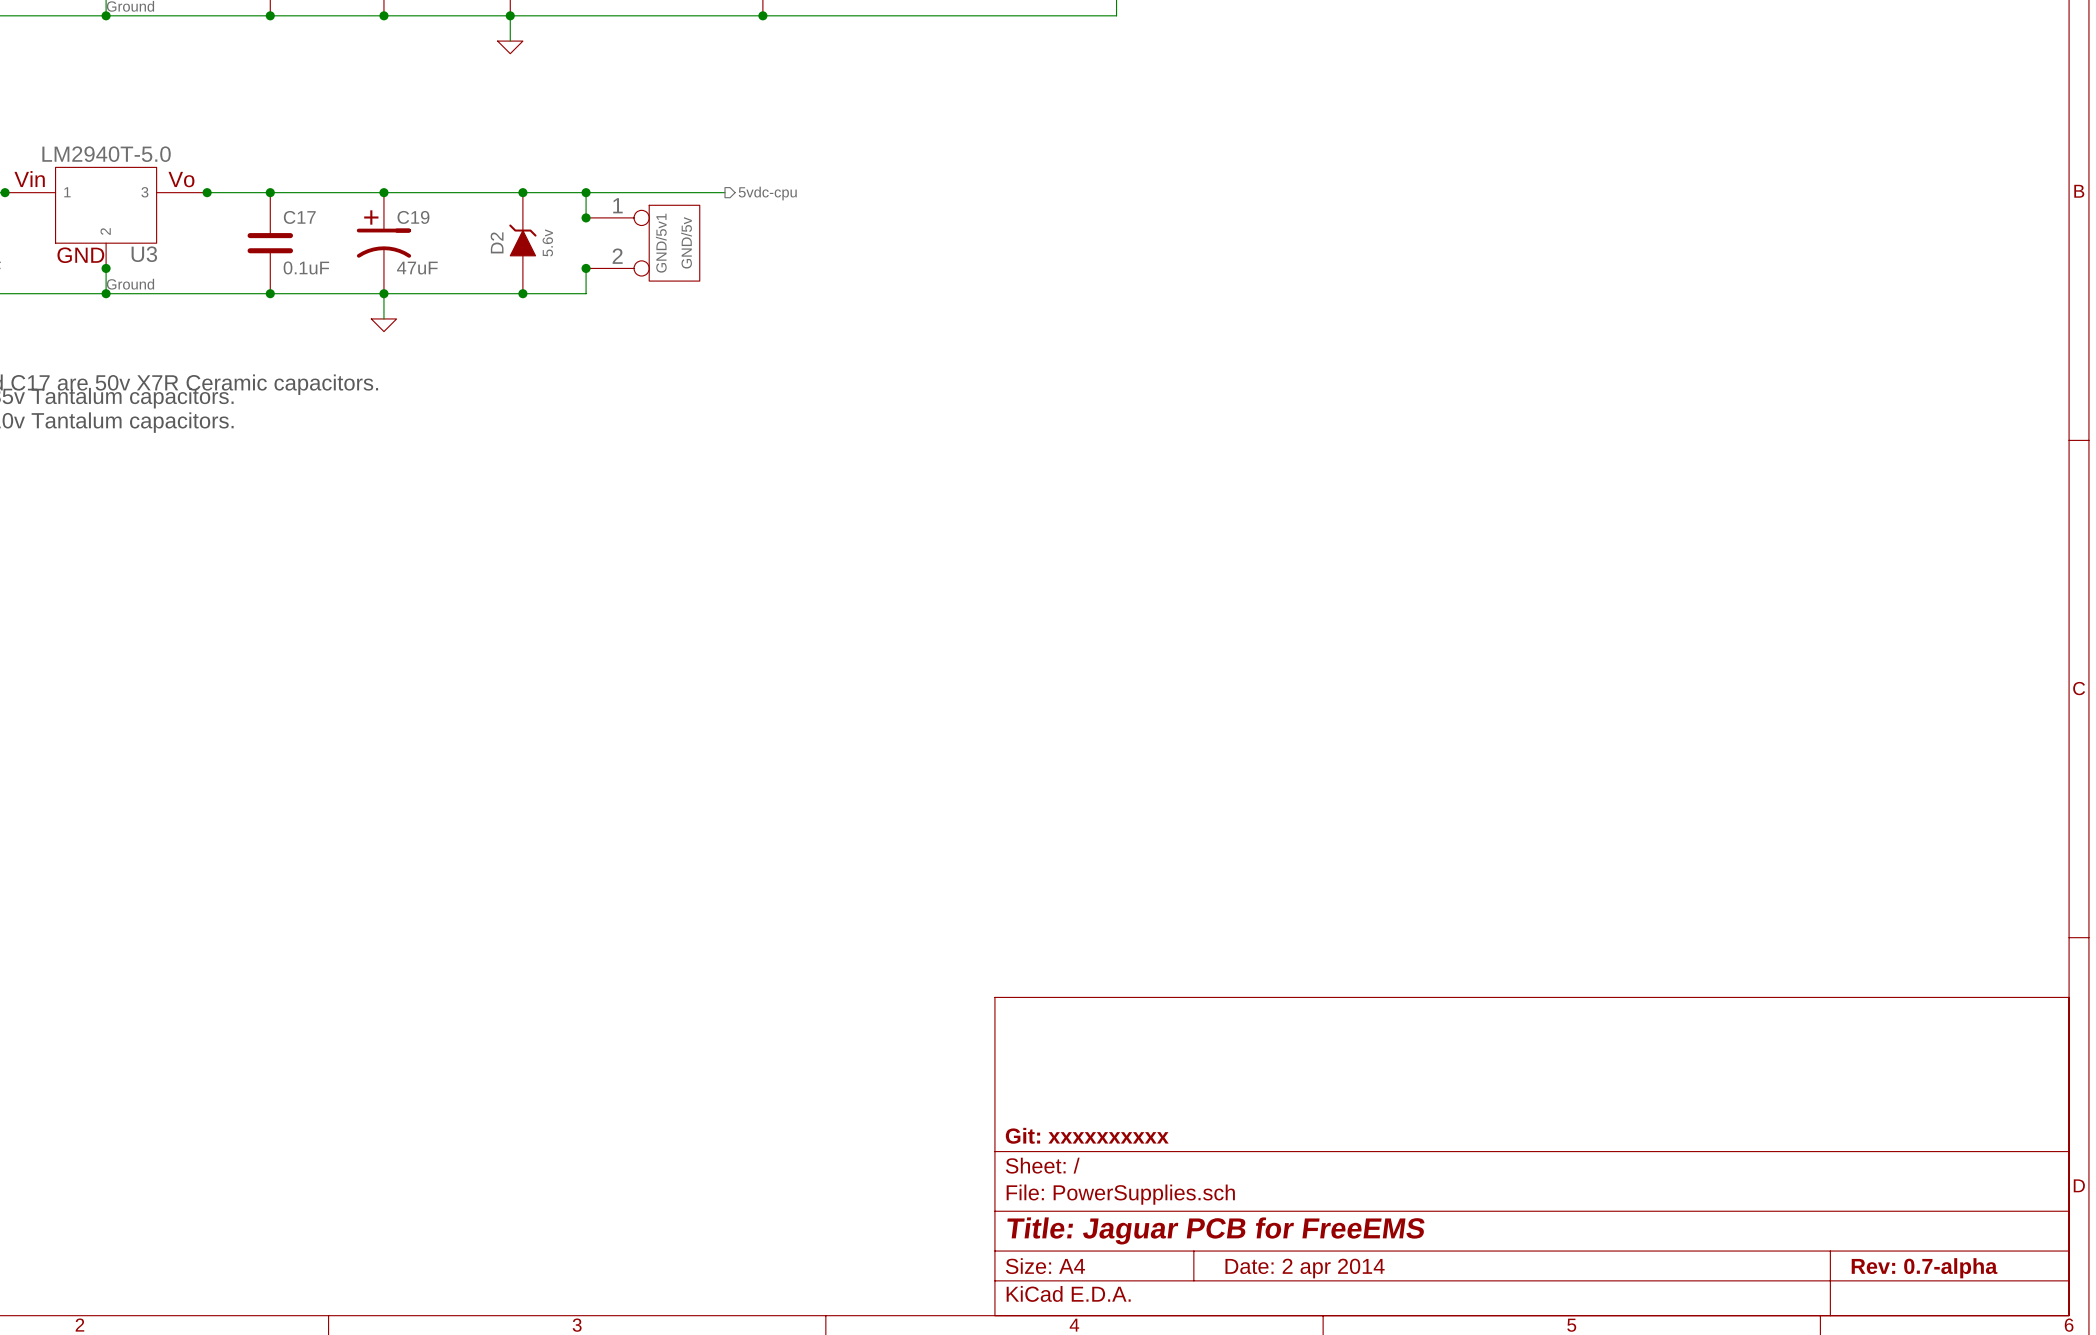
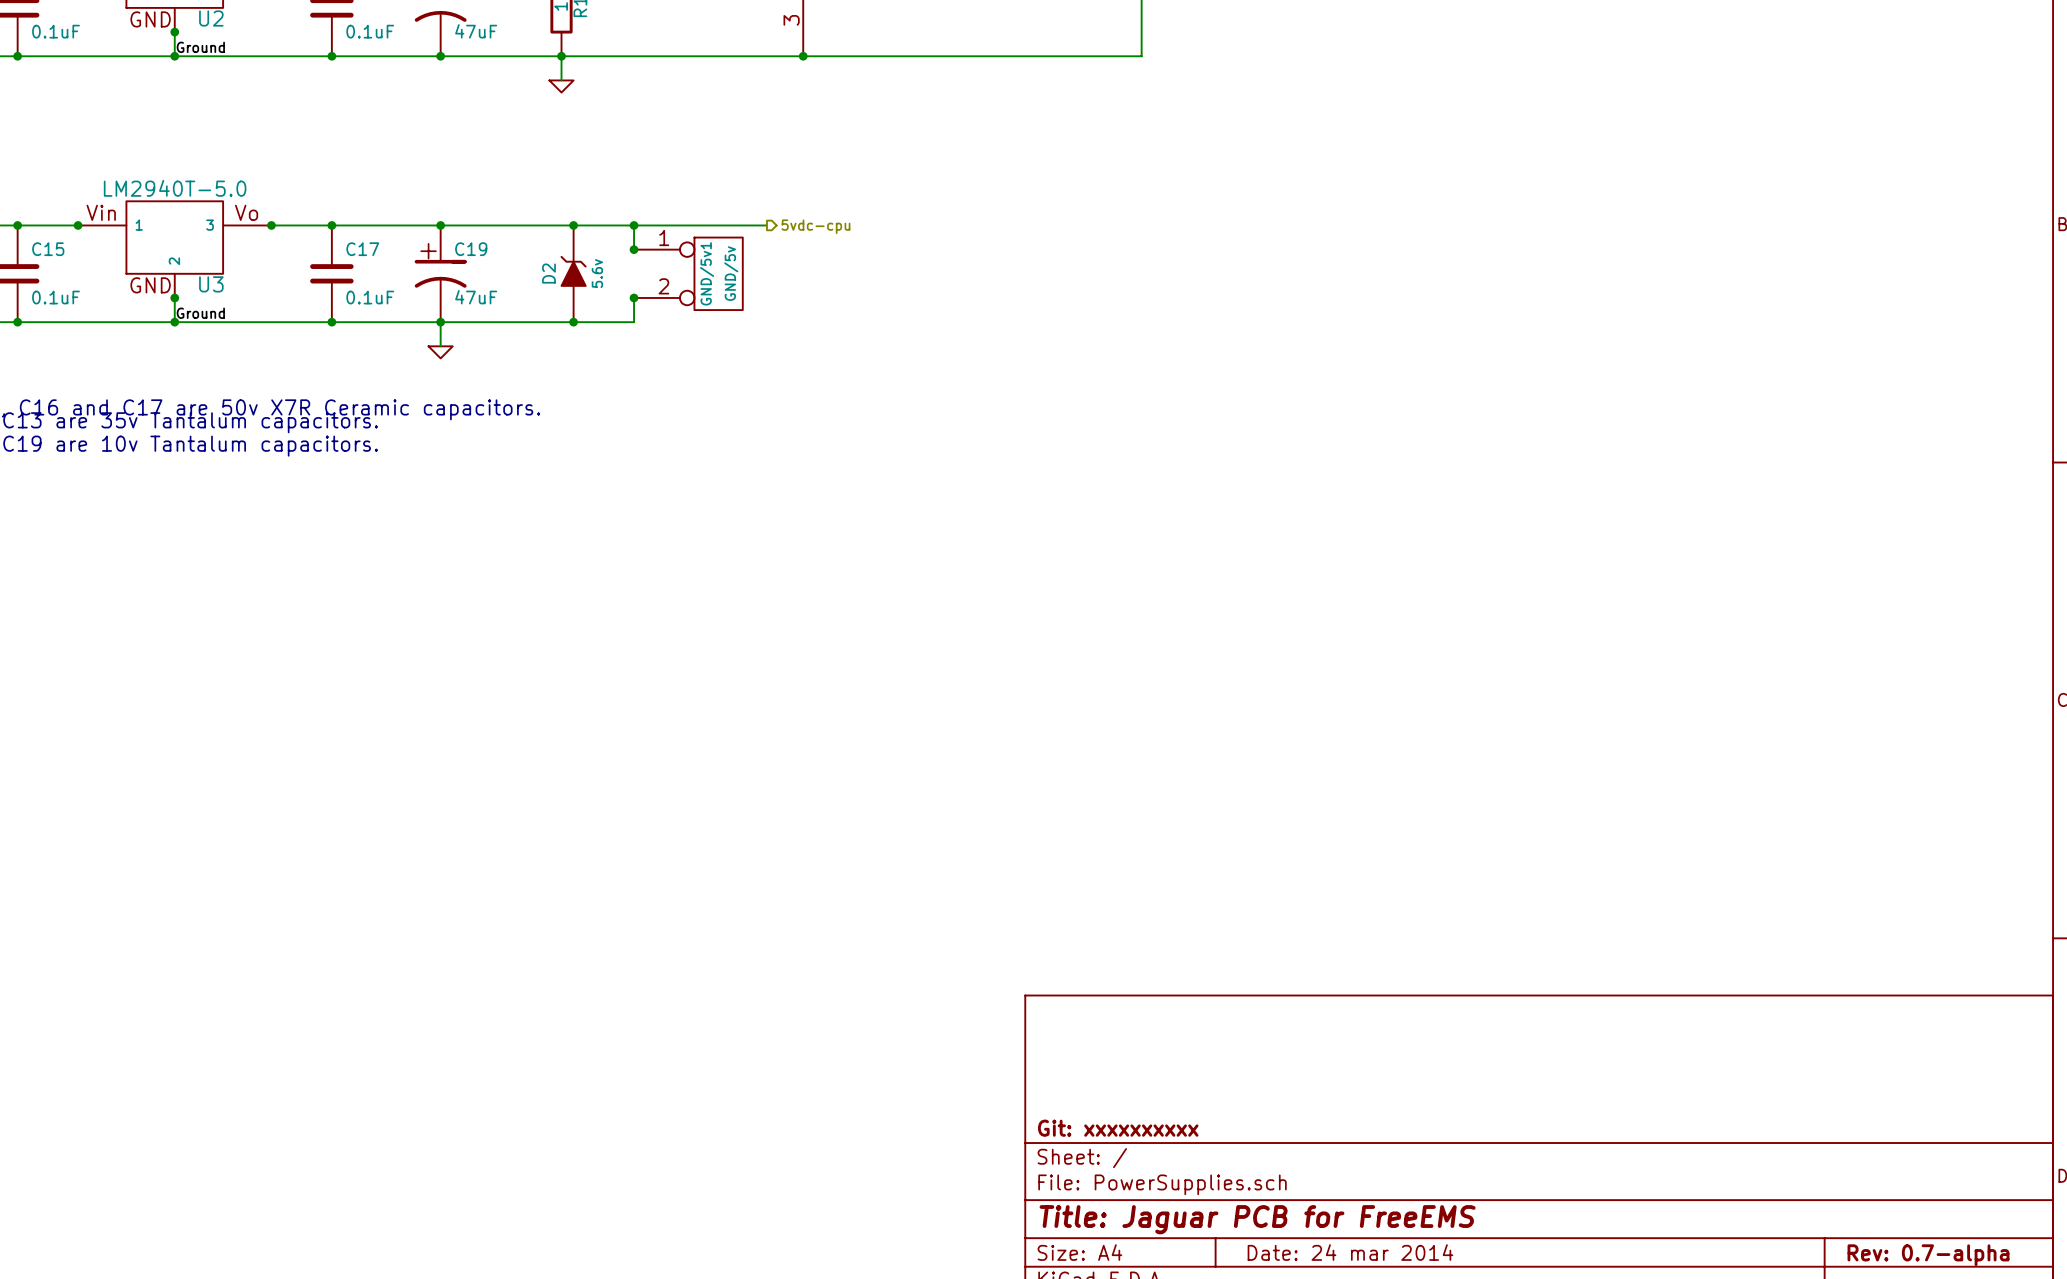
title block: Date: 2 apr 2014 (1305, 1268) -> Date: 24 mar 2014 (1350, 1252)

